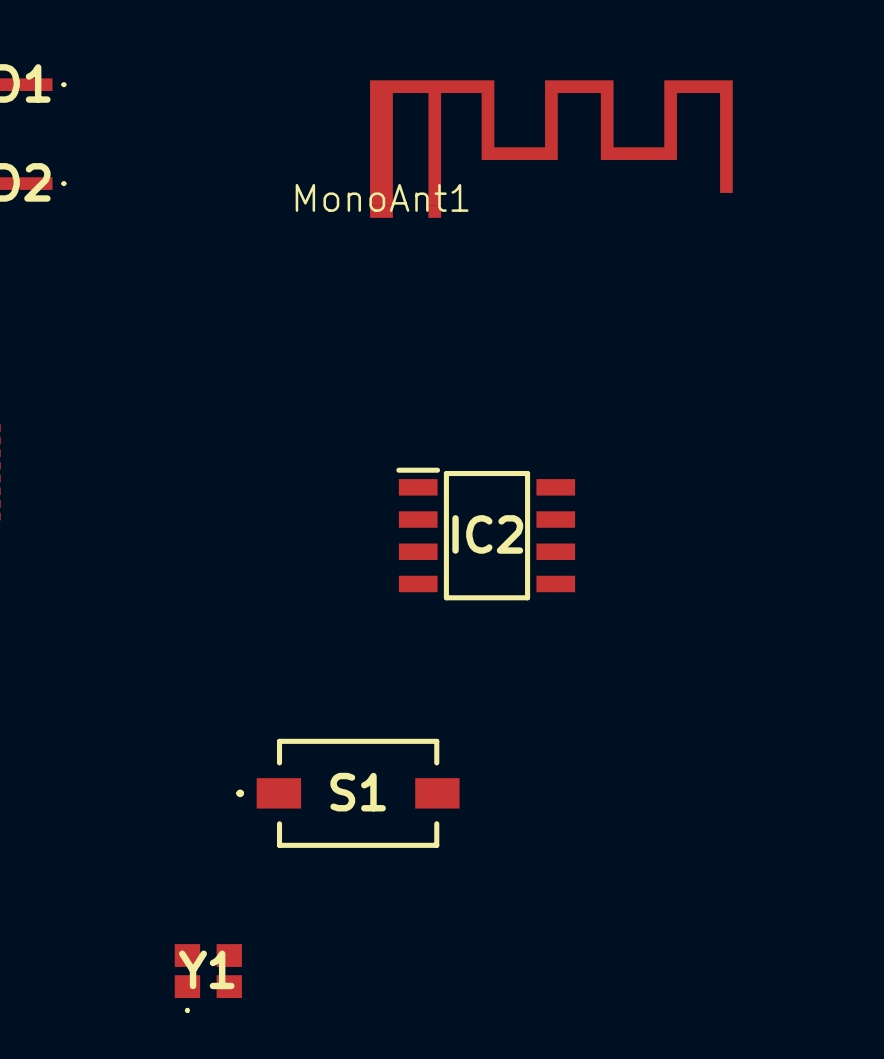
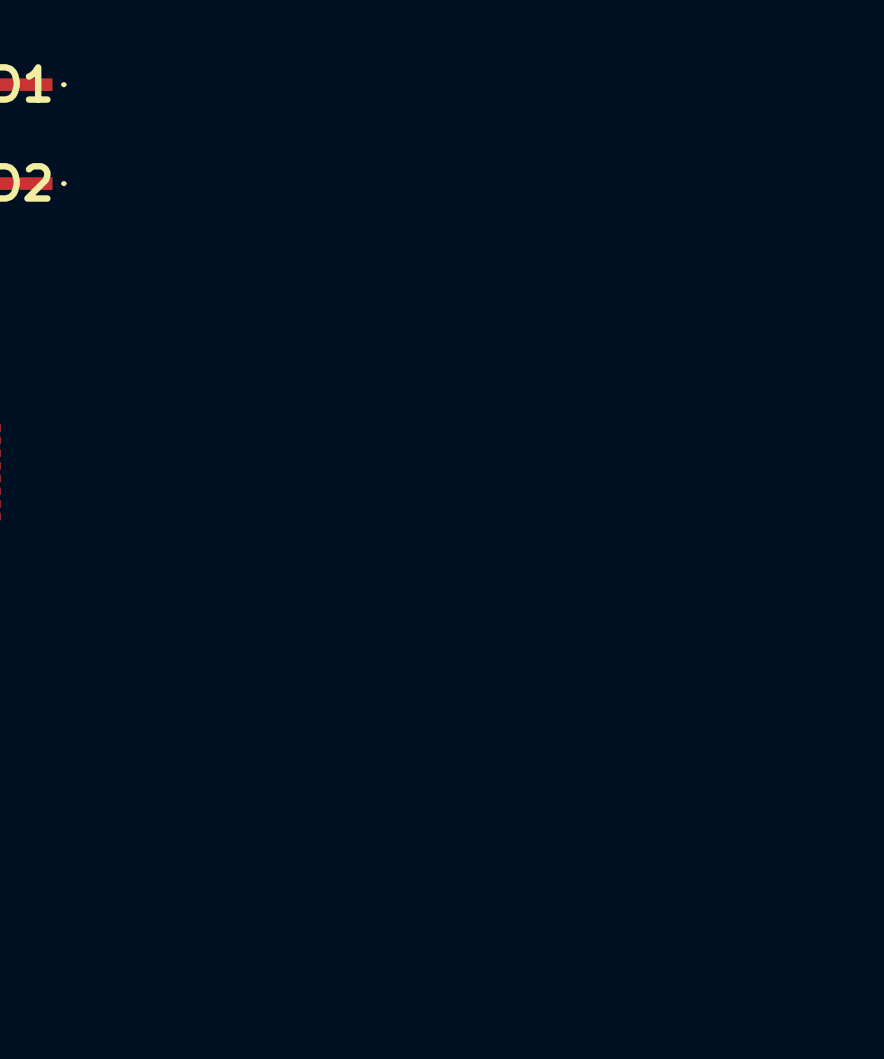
MonoAnt1: (551, 149) -> none
IC2: (485, 534) -> none
S1: (347, 793) -> none
Y1: (208, 978) -> none

